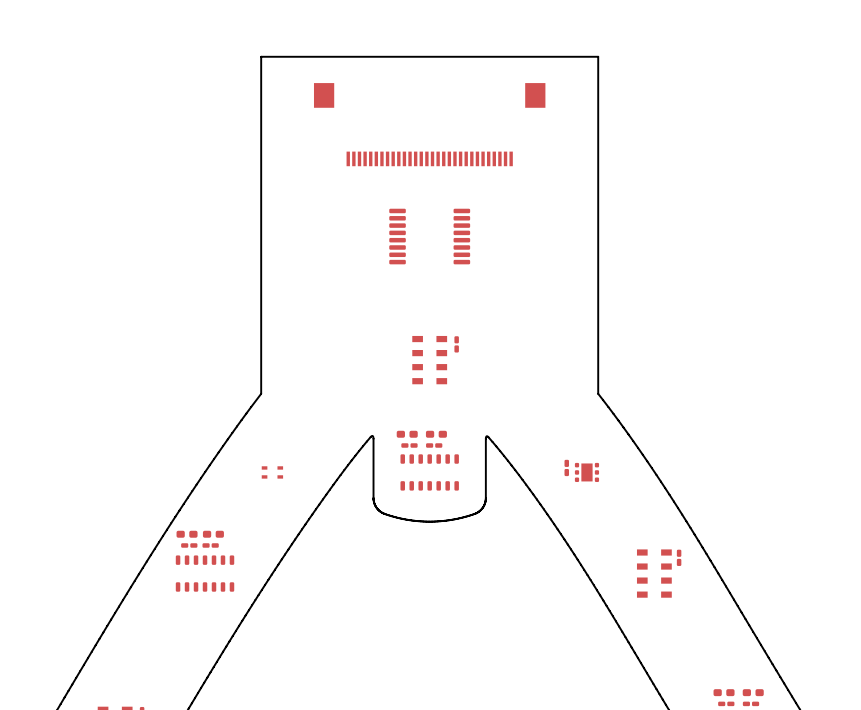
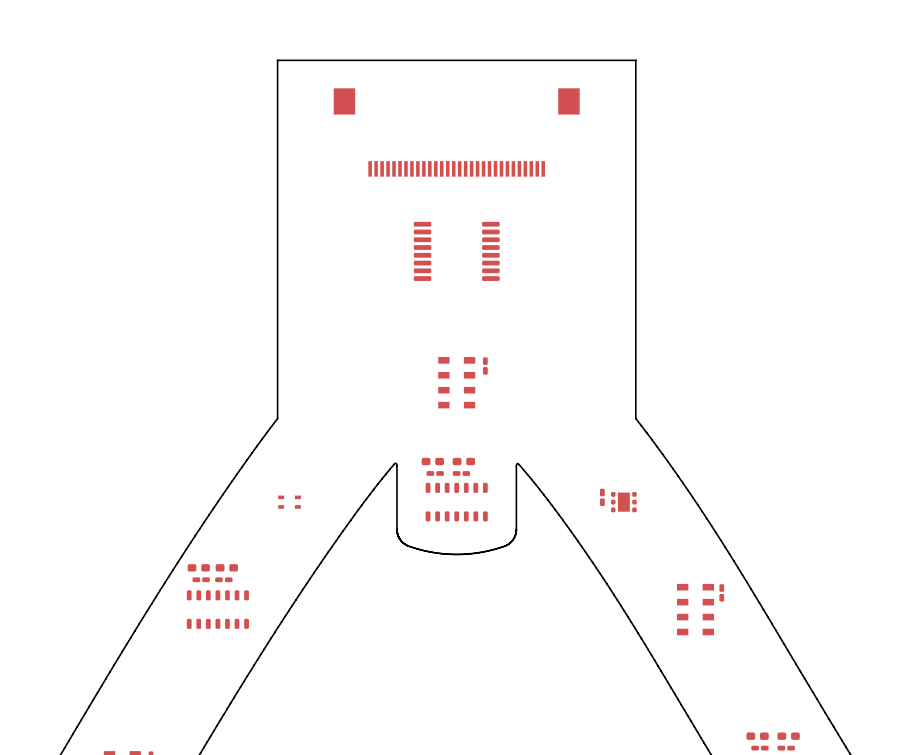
part: none -> (757, 736)
part: (724, 692) -> none
part: none -> (788, 736)
part: (753, 692) -> none
part: none -> (759, 748)
part: (726, 703) -> none
part: none -> (786, 748)
part: (751, 703) -> none

